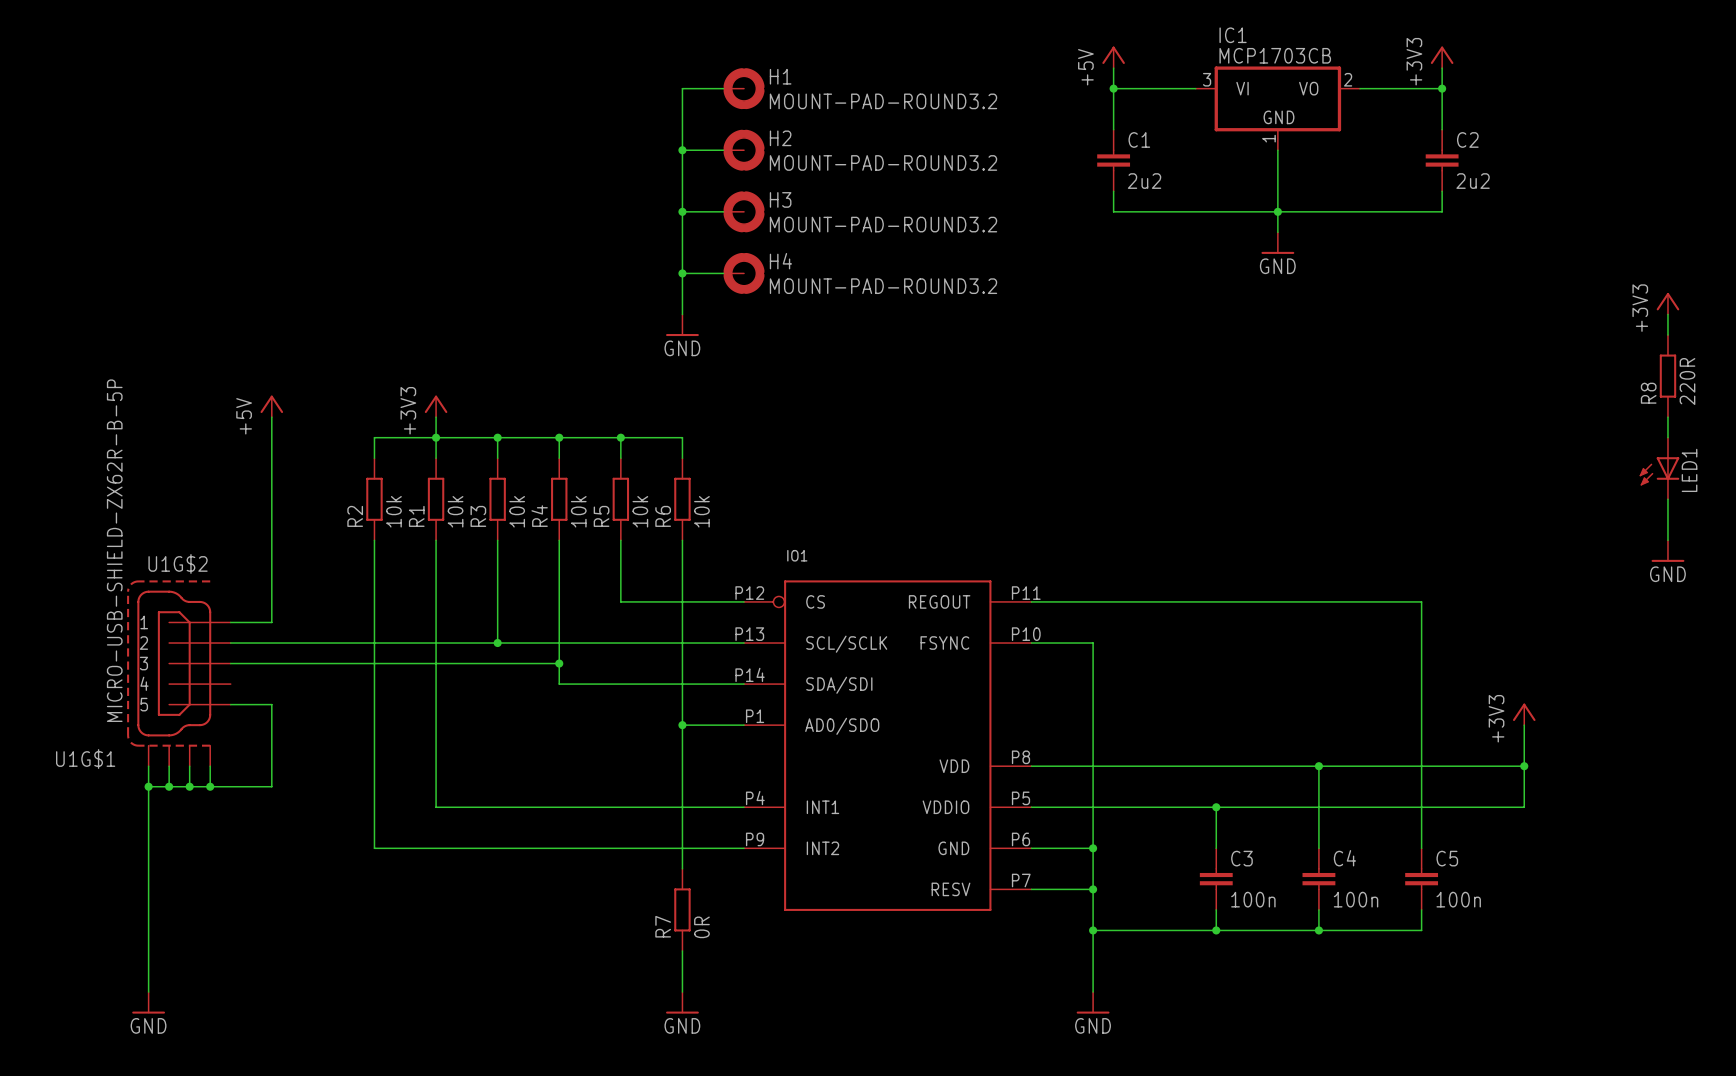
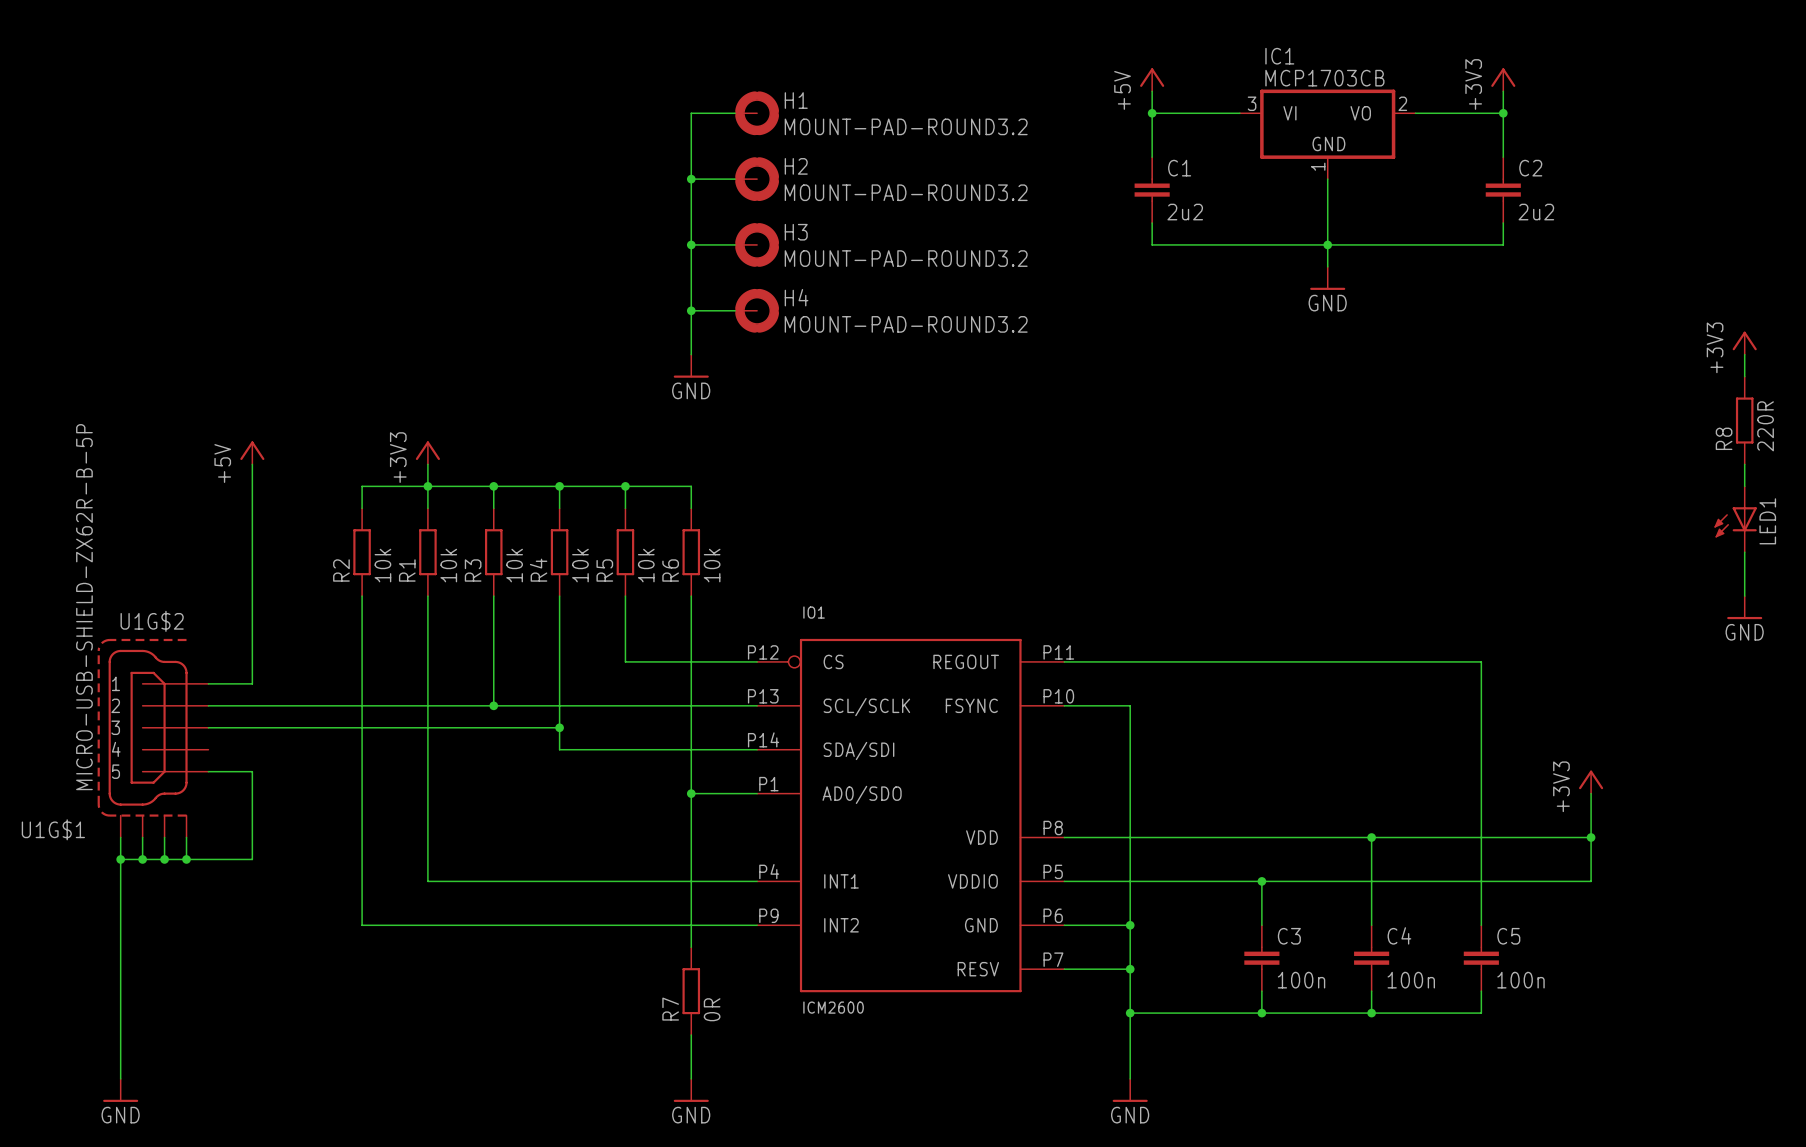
IO1 value: none -> ICM2600 (833, 1007)

